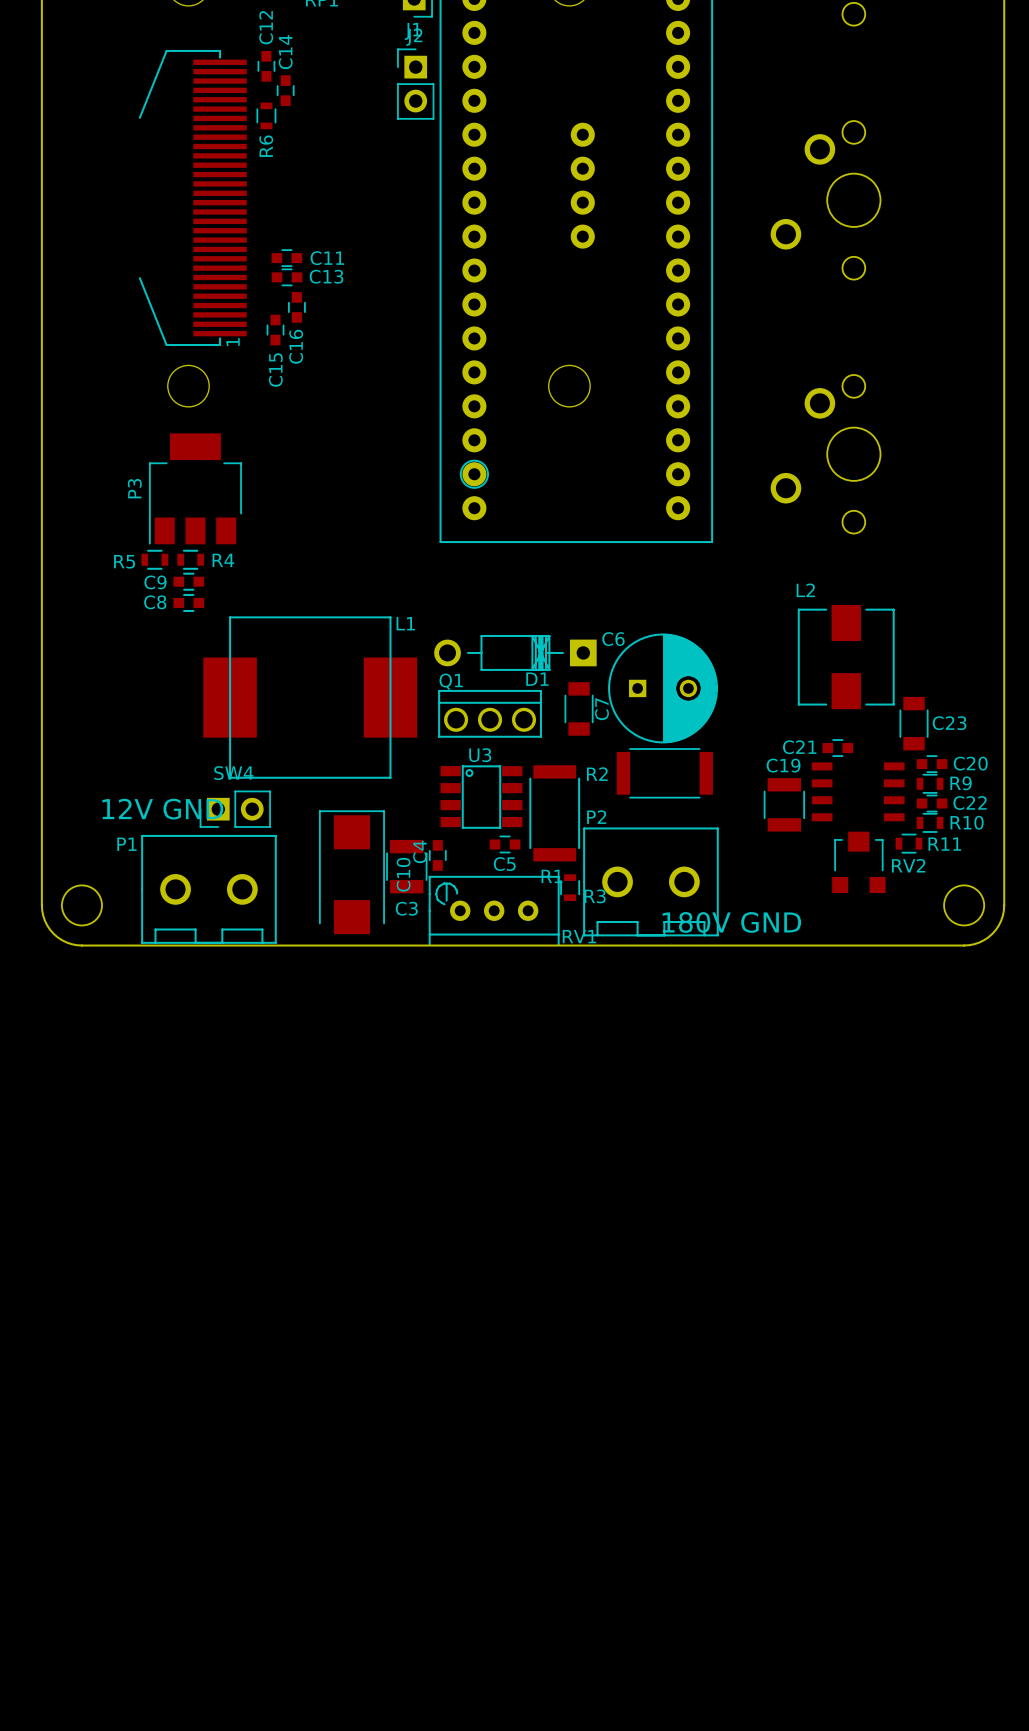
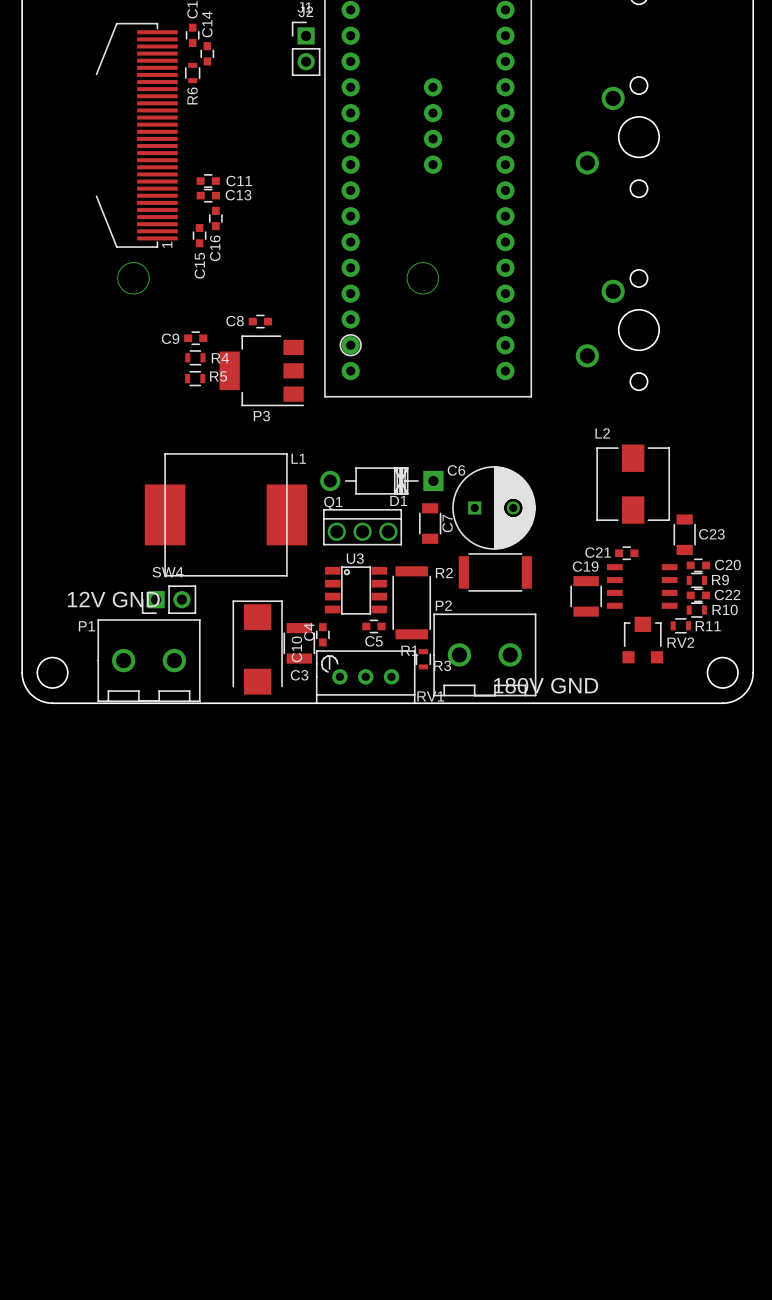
P3 rotation: 0° (195, 488) -> 90° counterclockwise (261, 370)
P3 position: (195, 488) -> (261, 370)
R5 position: (154, 559) -> (195, 378)
R4 position: (190, 559) -> (195, 357)
R5 name position: R5 (124, 561) -> R5 (218, 376)
C9 position: (188, 581) -> (195, 338)
C8 position: (188, 602) -> (260, 321)

